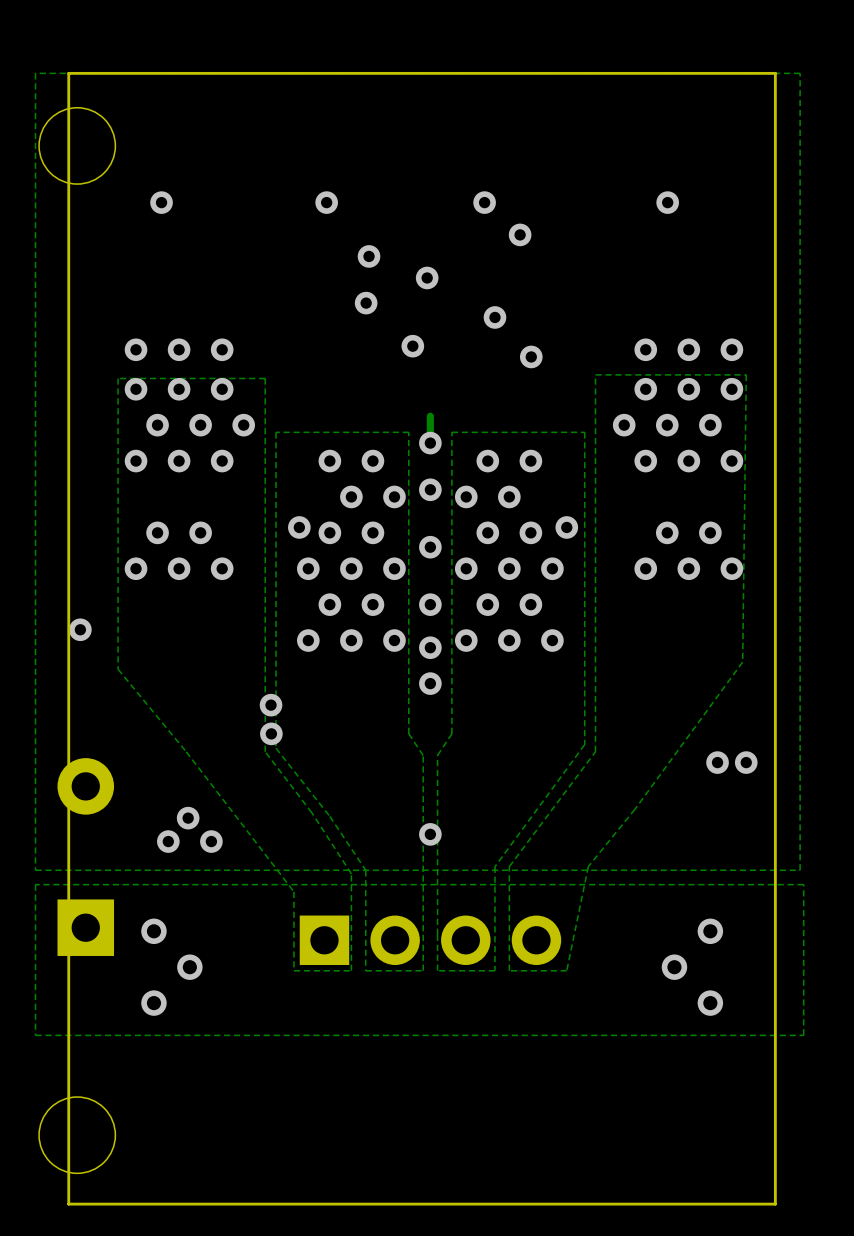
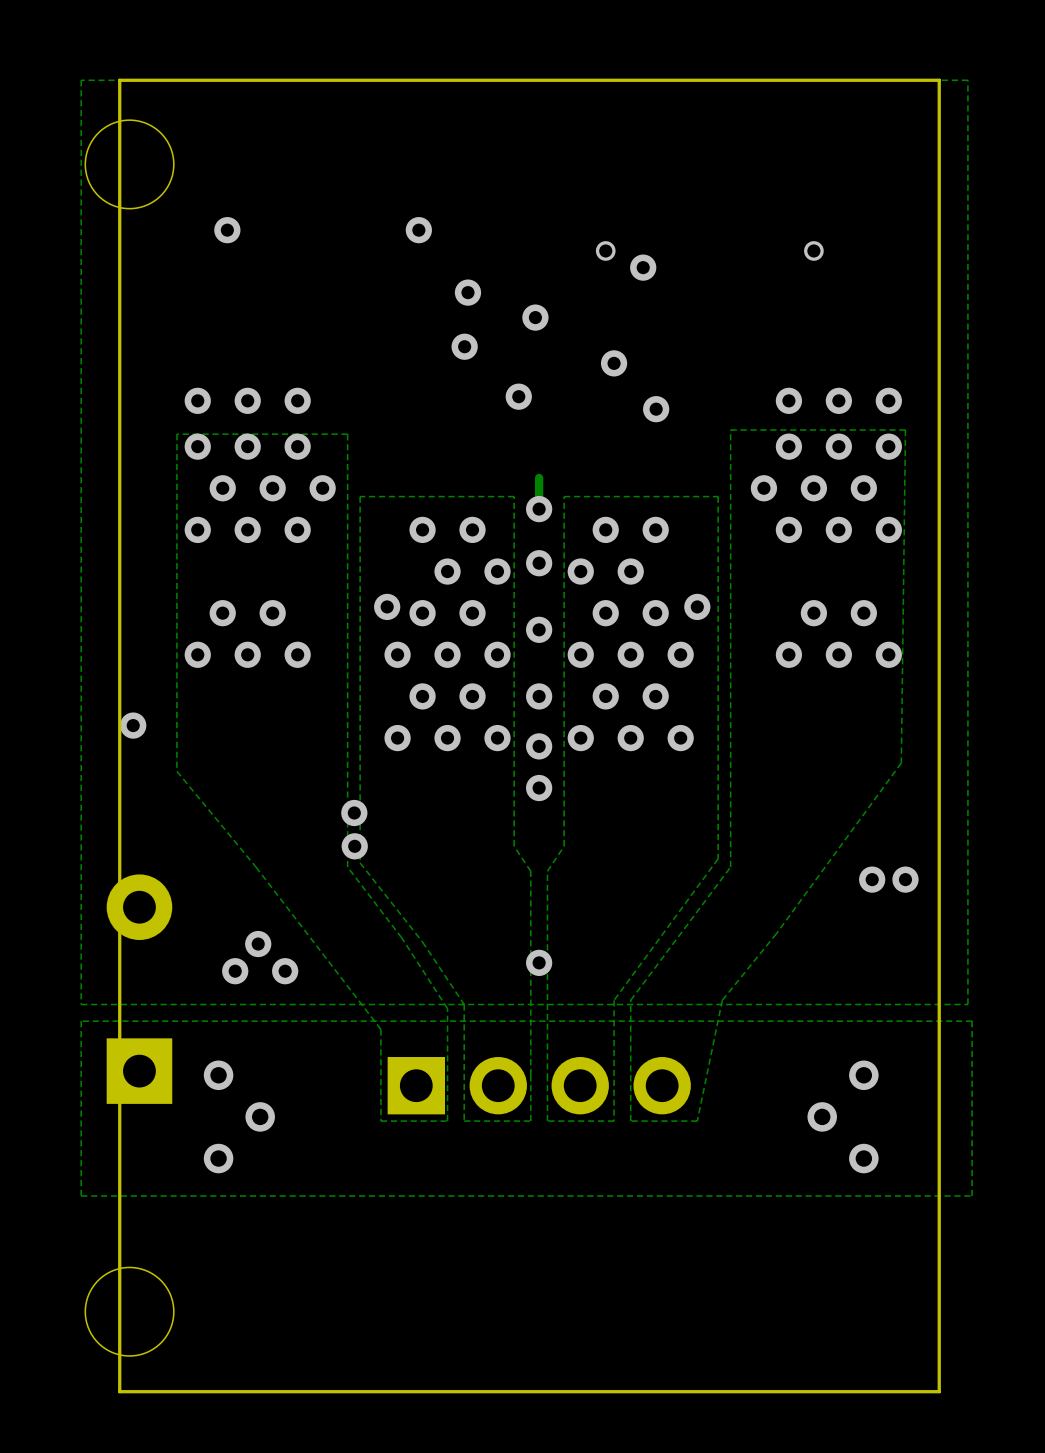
via position: (484, 202) -> (605, 250)
via position: (667, 202) -> (813, 250)

